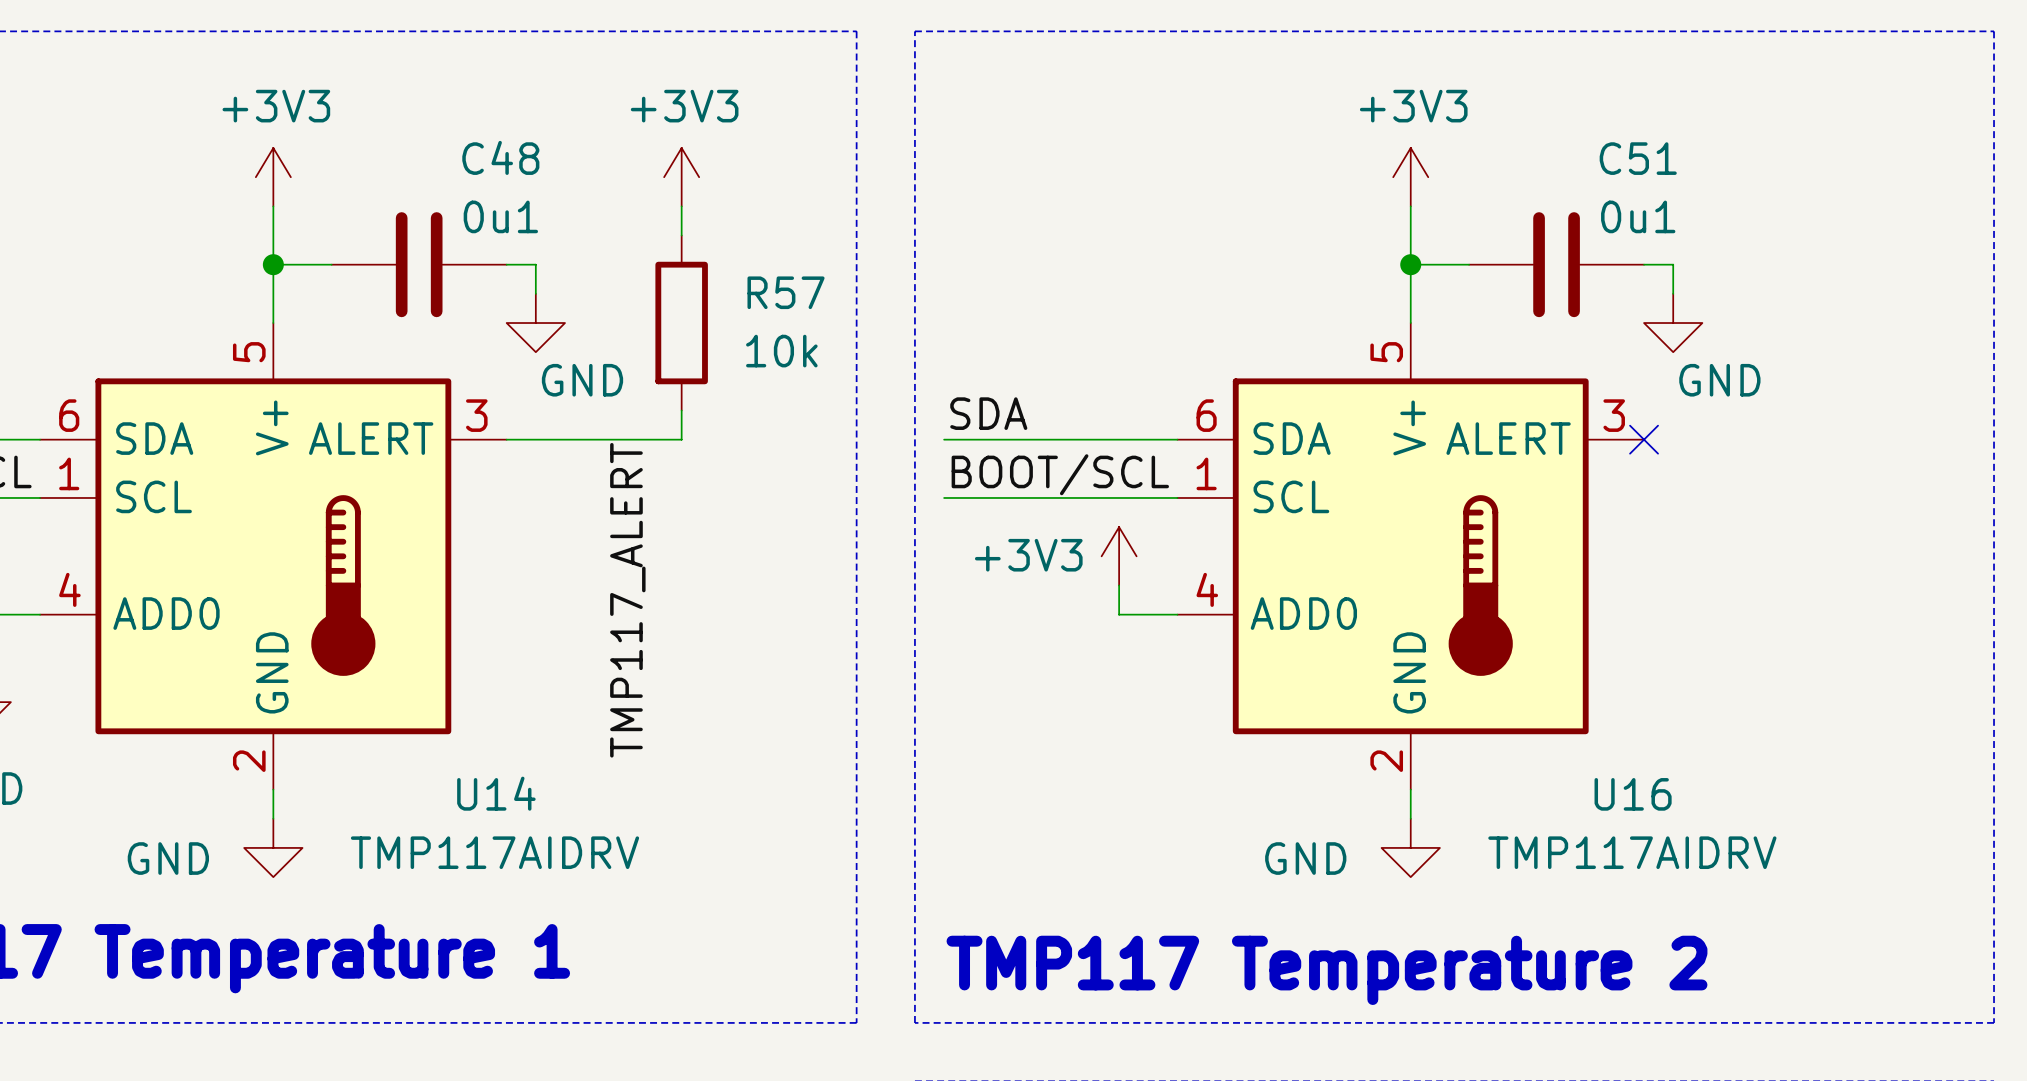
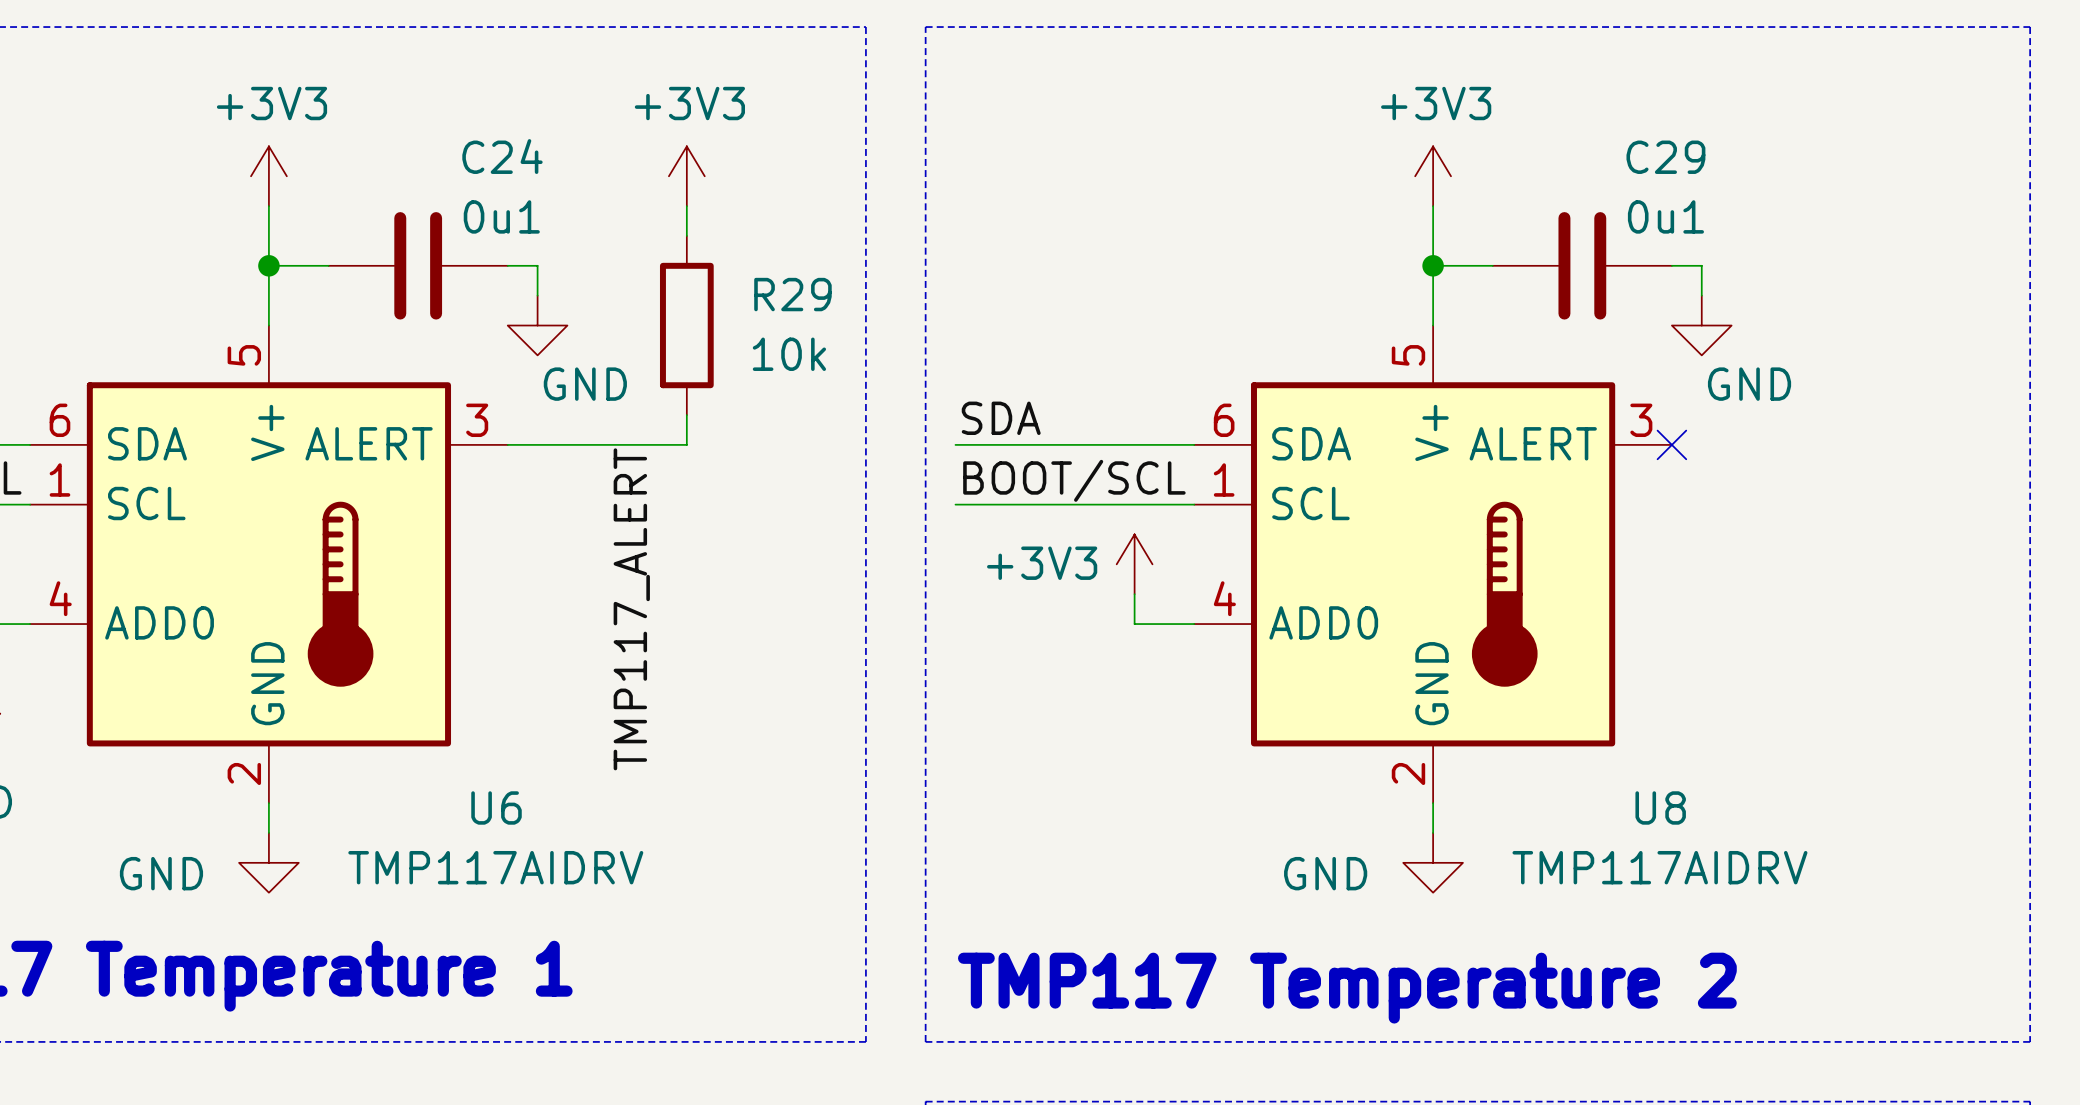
C48 name: C48 (500, 157) -> C24 (502, 156)
C51 name: C51 (1638, 158) -> C29 (1665, 157)
R57 name: R57 (786, 292) -> R29 (792, 294)
U14 name: U14 (496, 793) -> U6 (496, 807)
U16 name: U16 (1633, 794) -> U8 (1660, 807)

